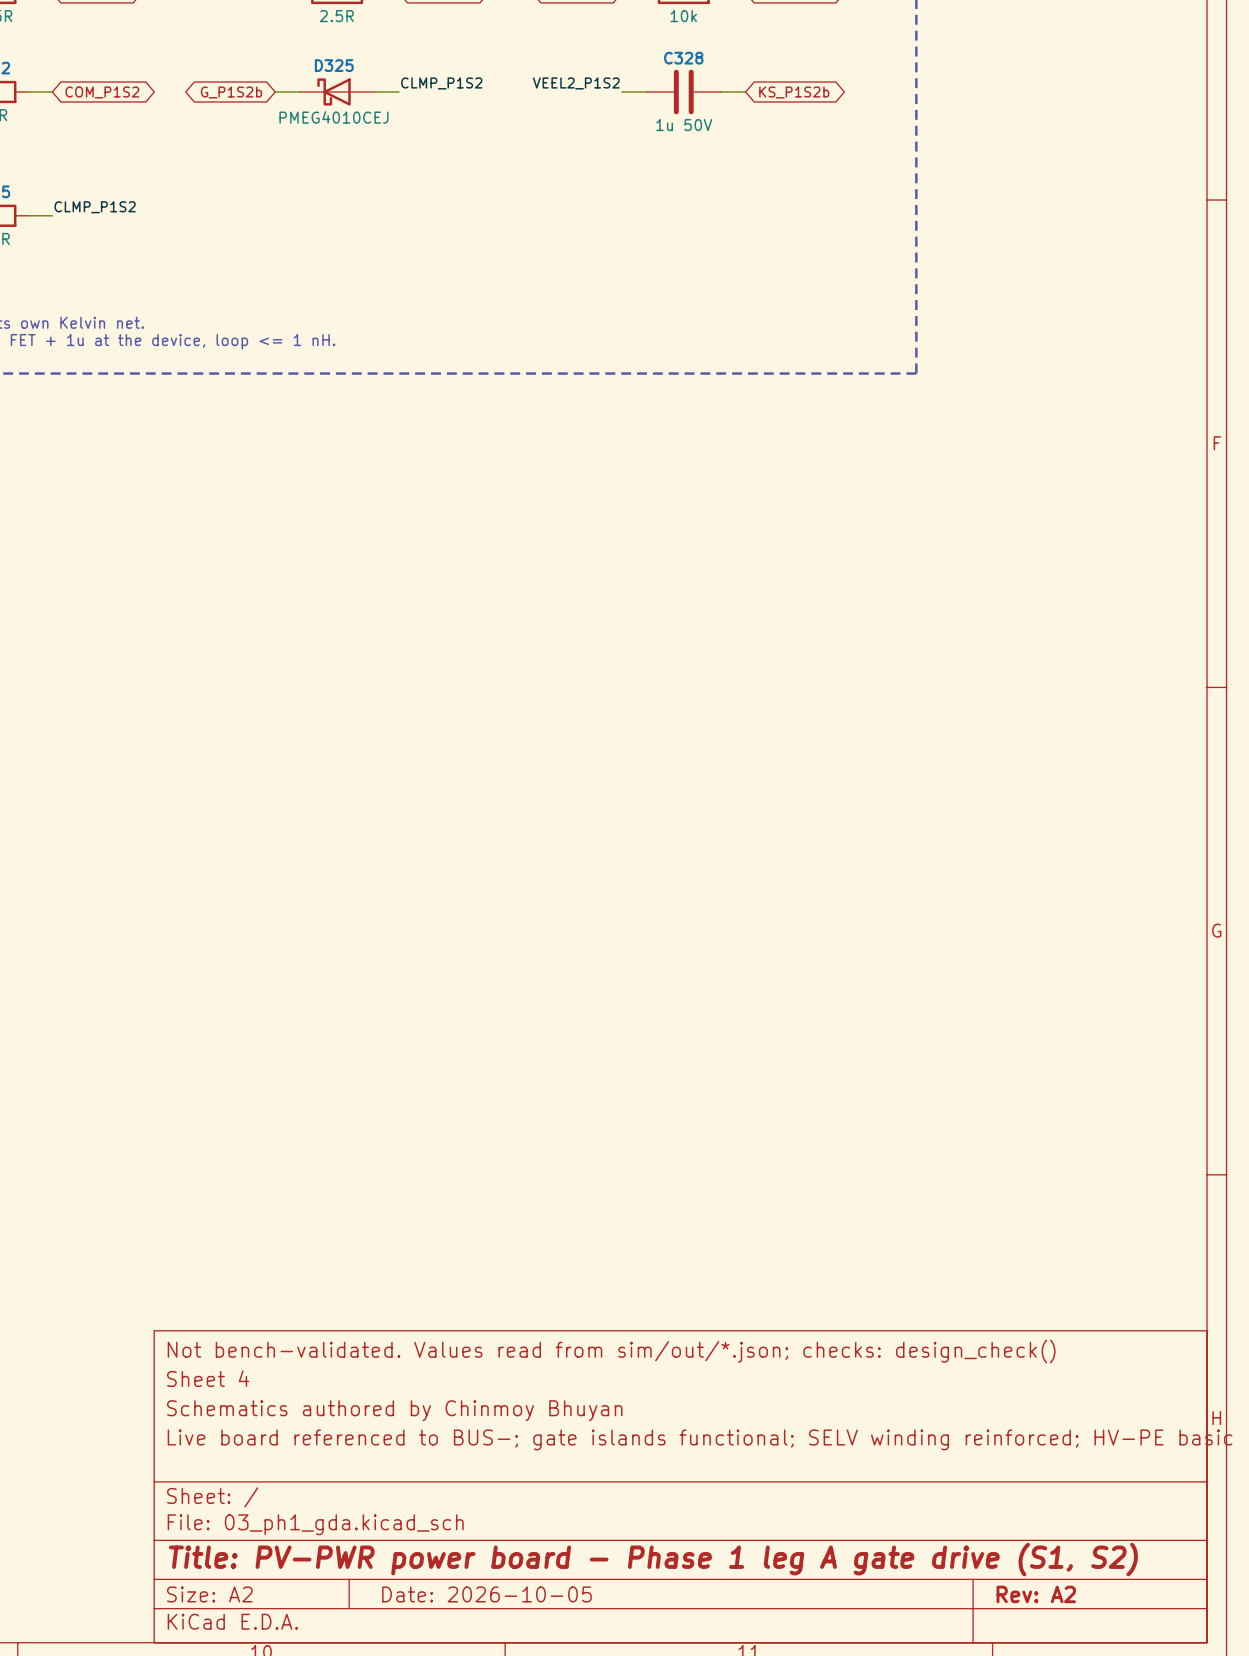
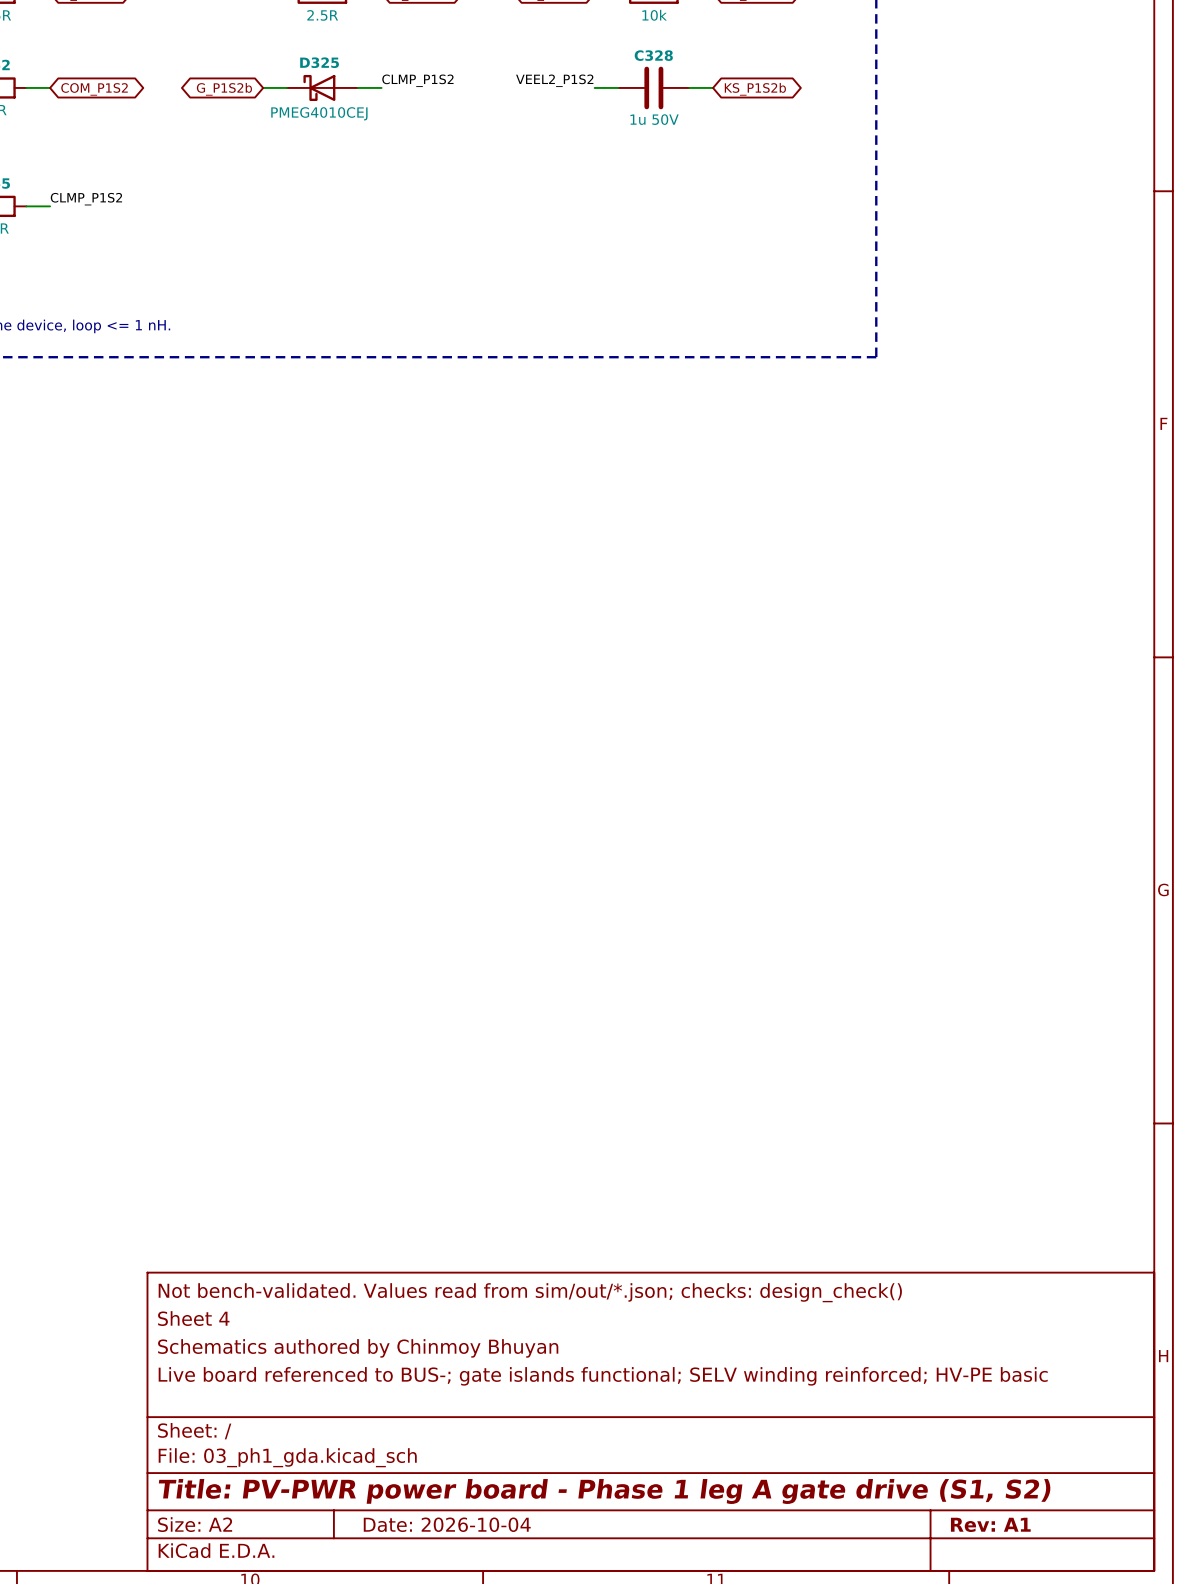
title block: Date: 2026-10-05 (486, 1594) -> Date: 2026-10-04 (447, 1524)
title block: Rev: A2 (1036, 1594) -> Rev: A1 (990, 1524)

